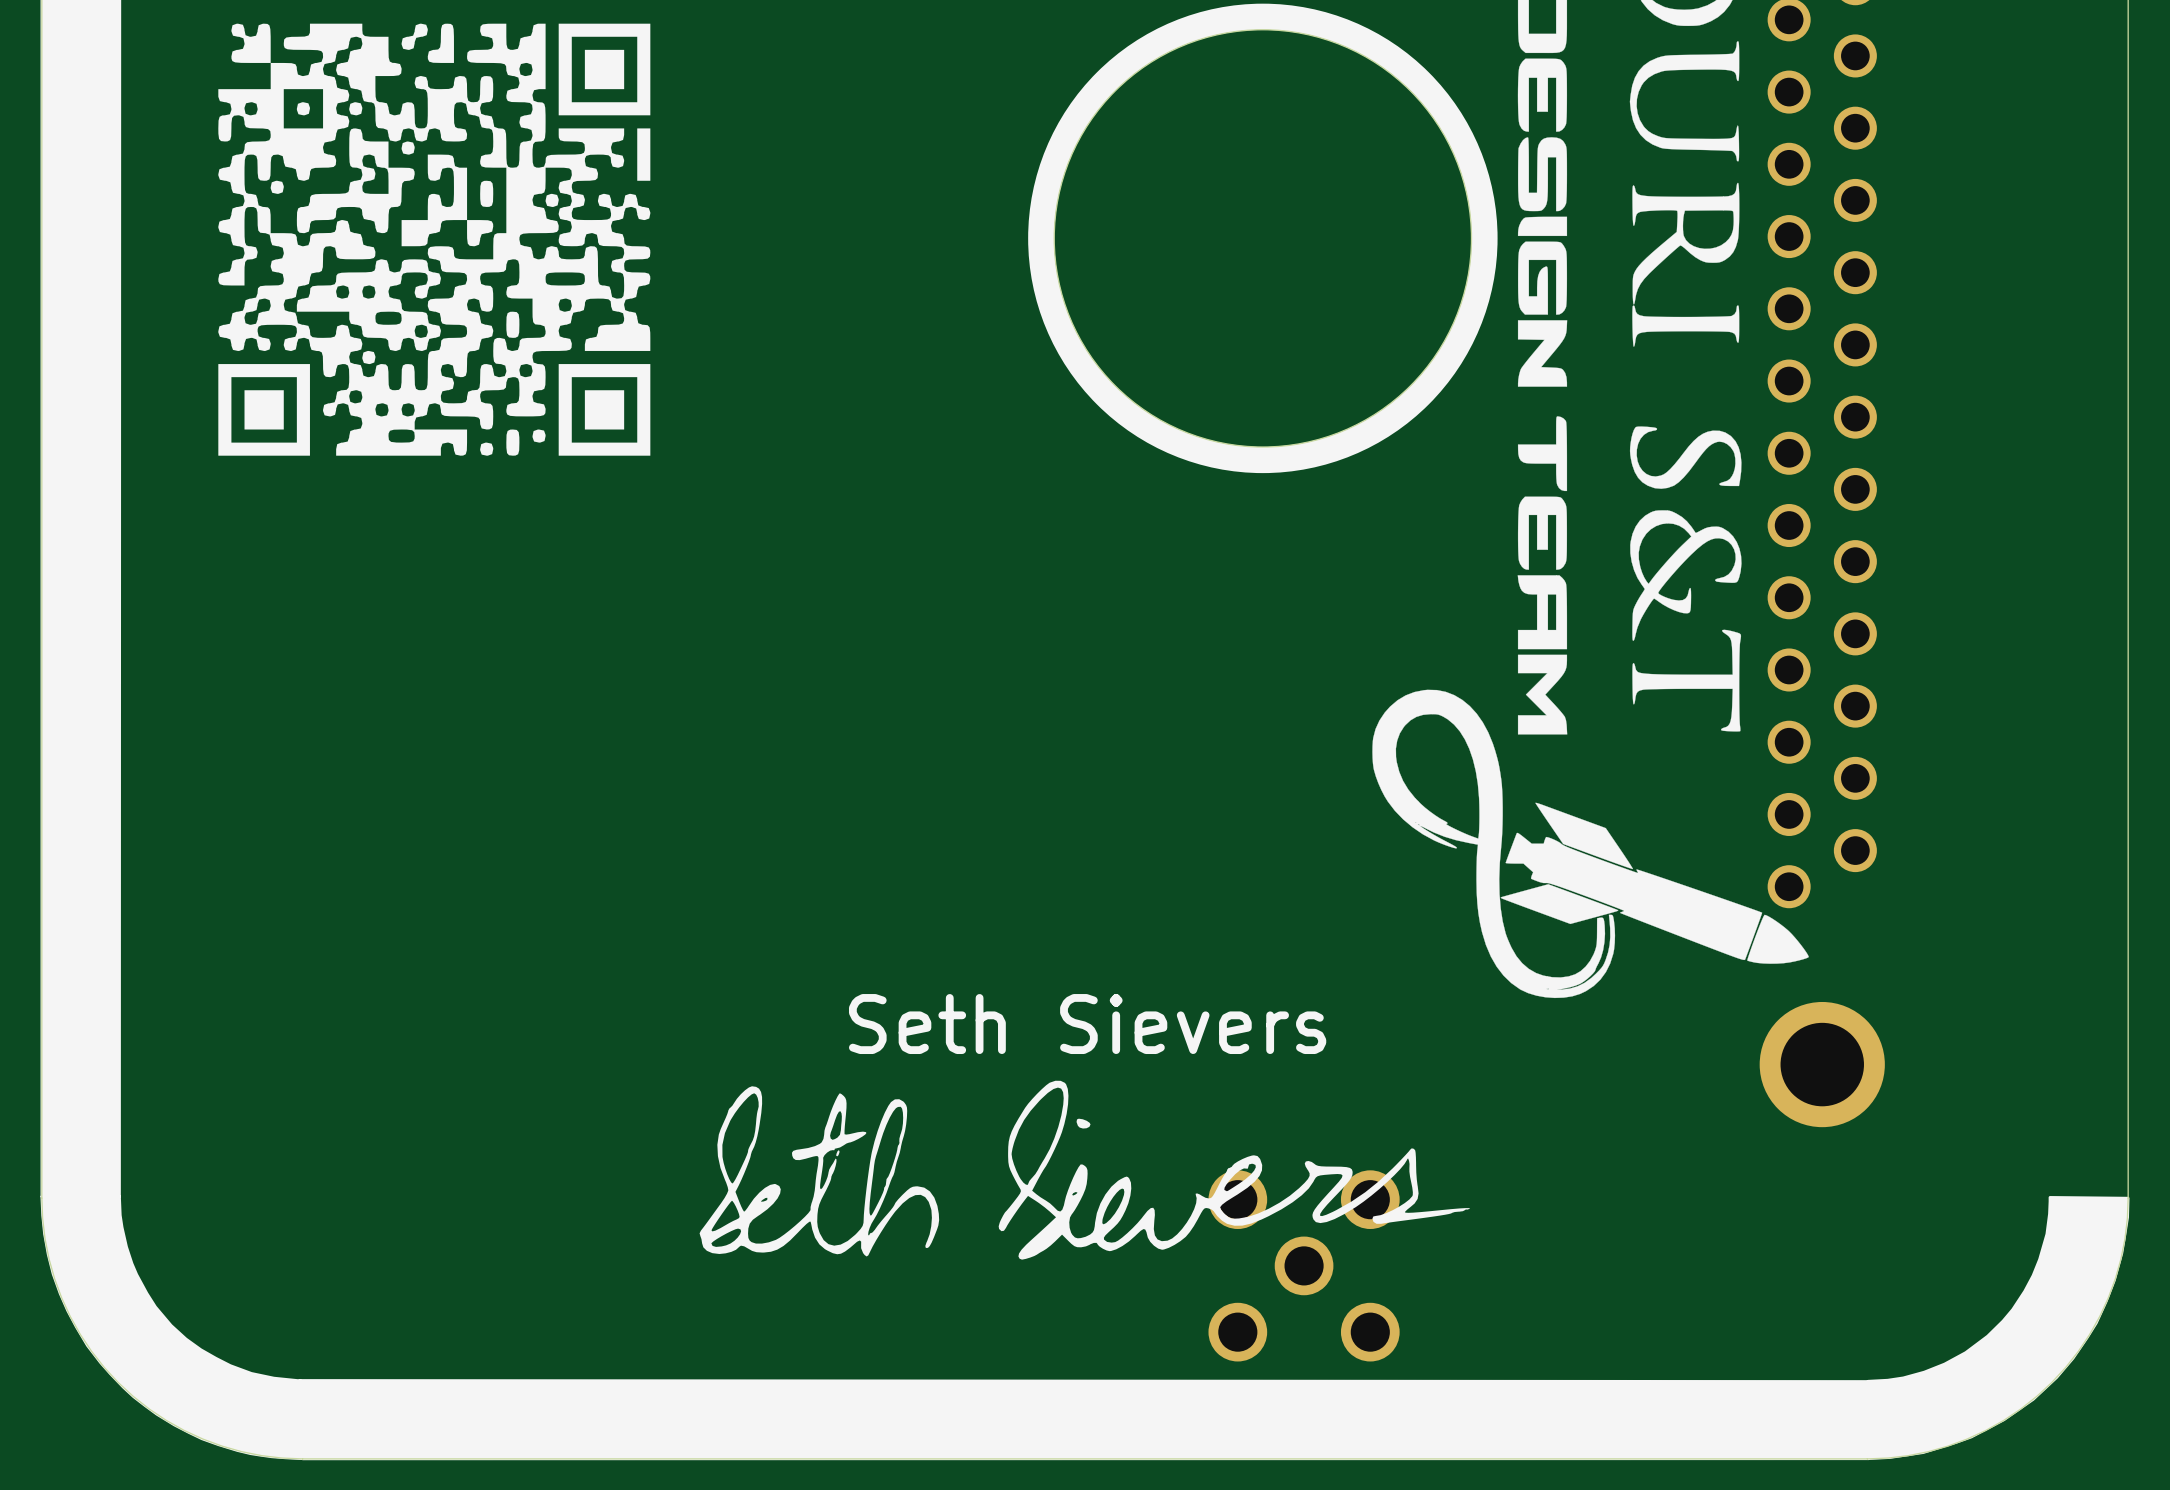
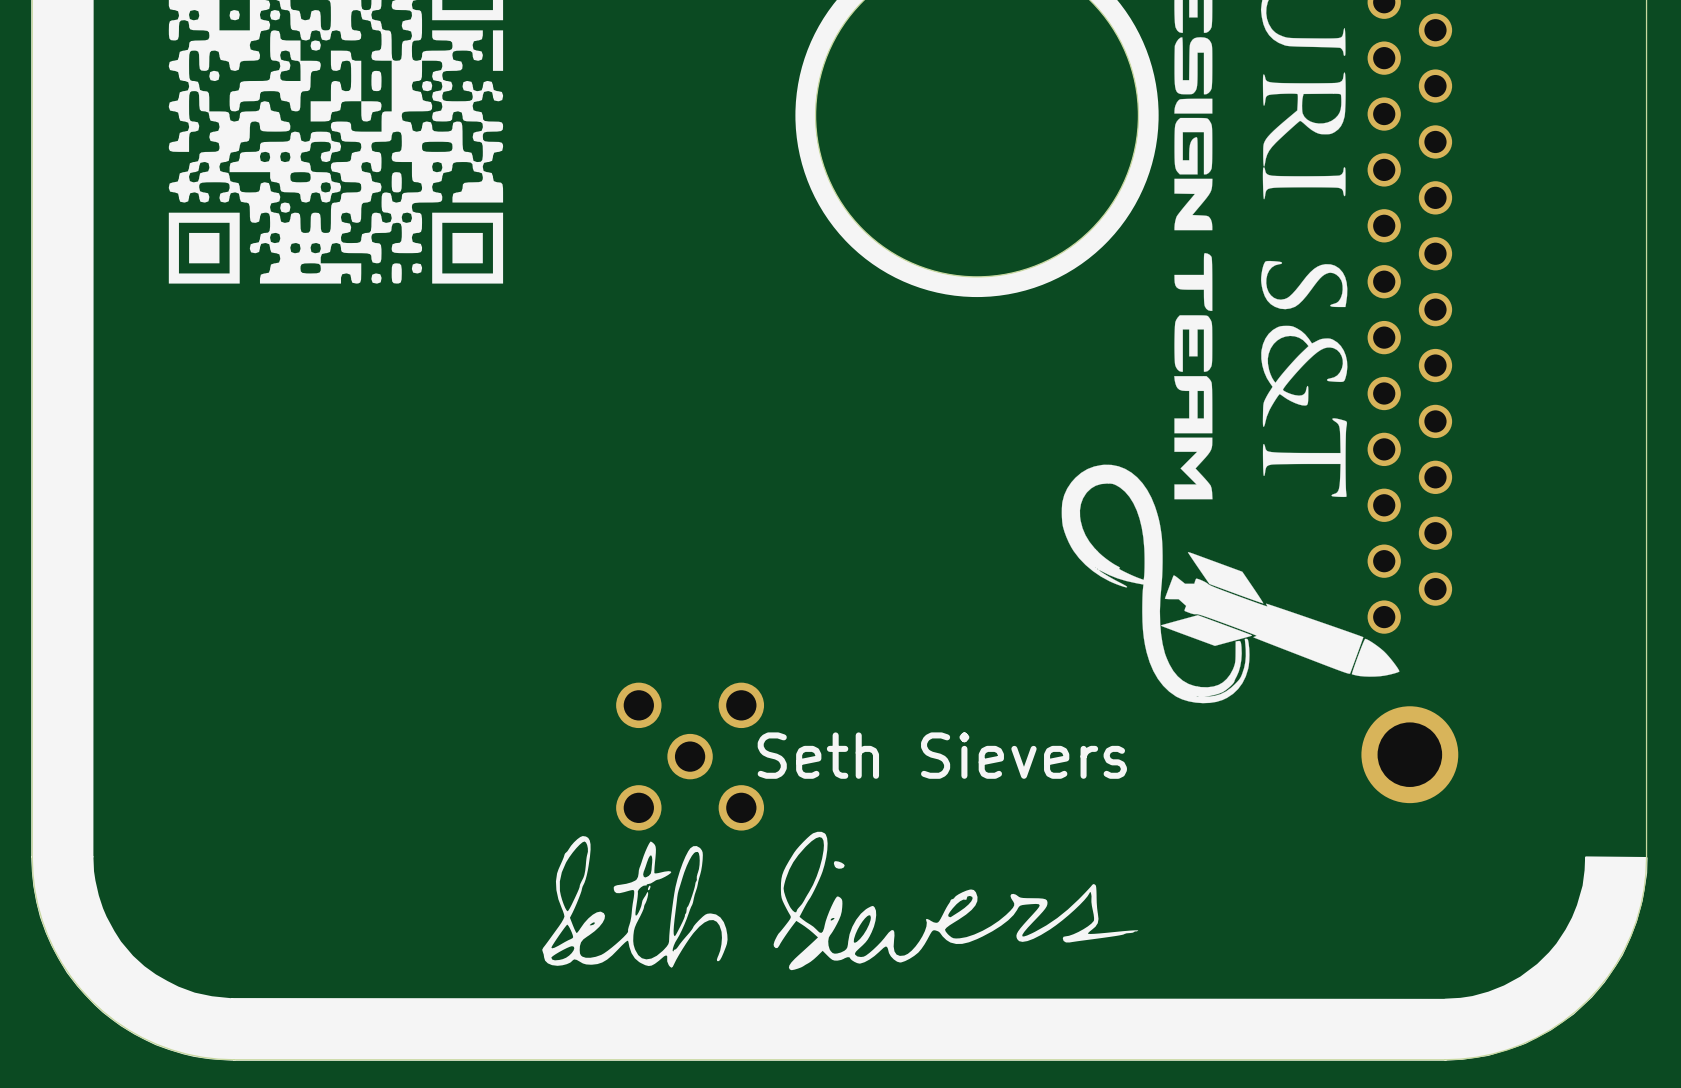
text position: Seth Sievers (1087, 1024) -> Seth Sievers (942, 755)
drawing position: (1084, 1170) -> (840, 900)
part position: (1304, 1265) -> (690, 756)

